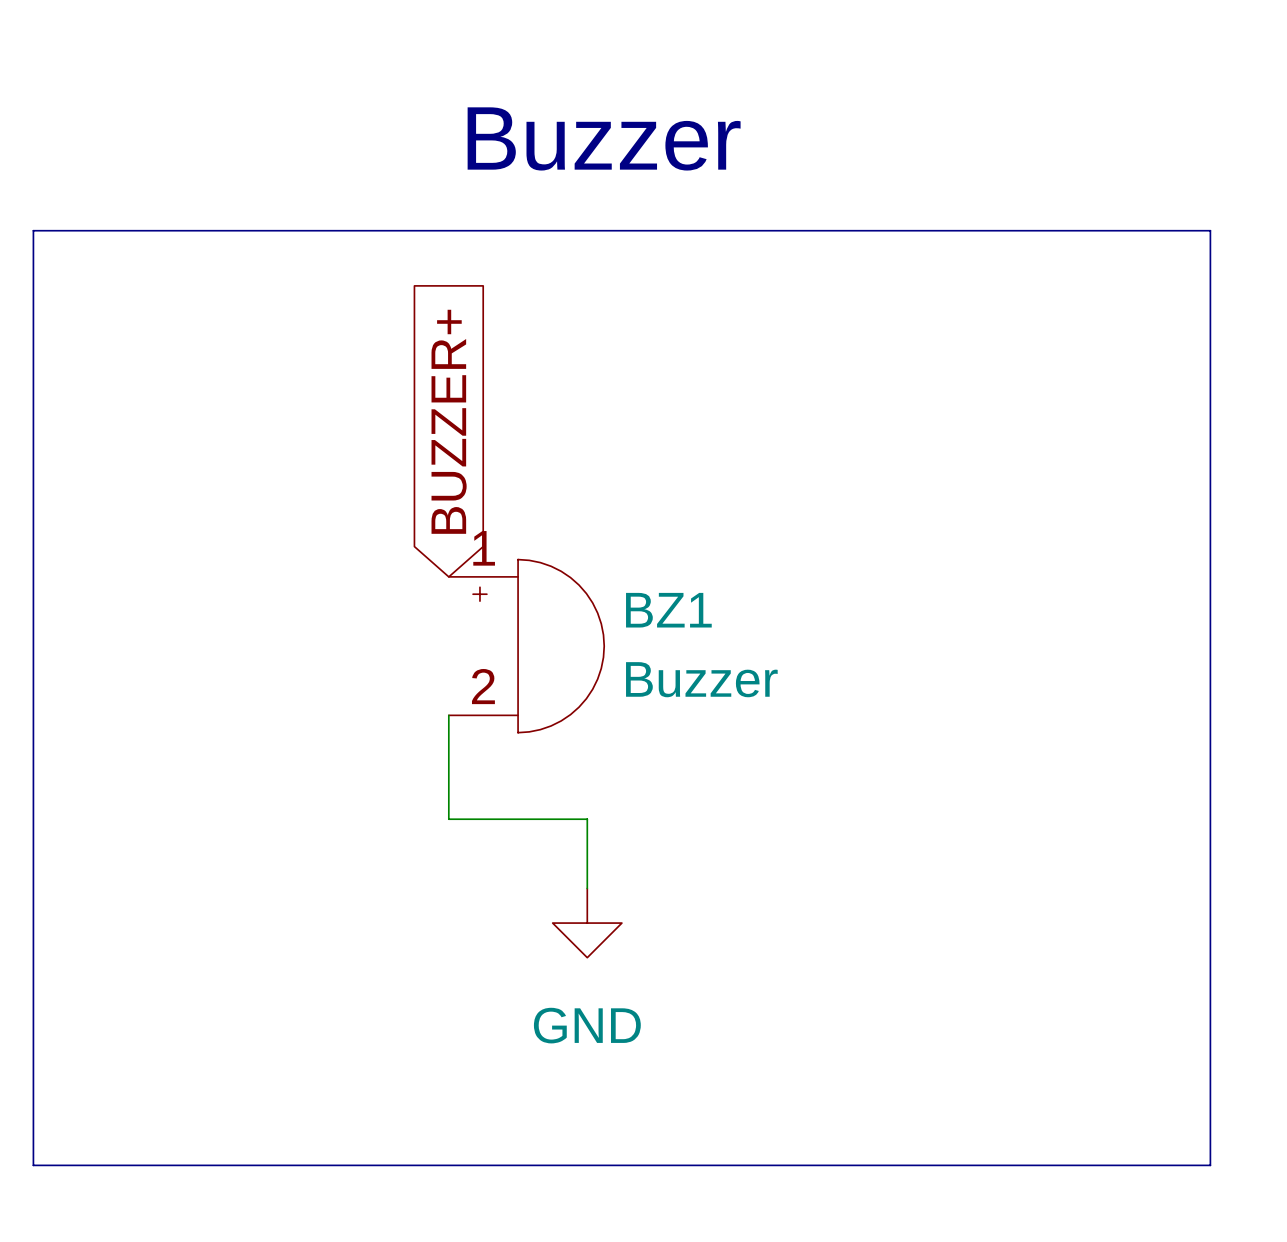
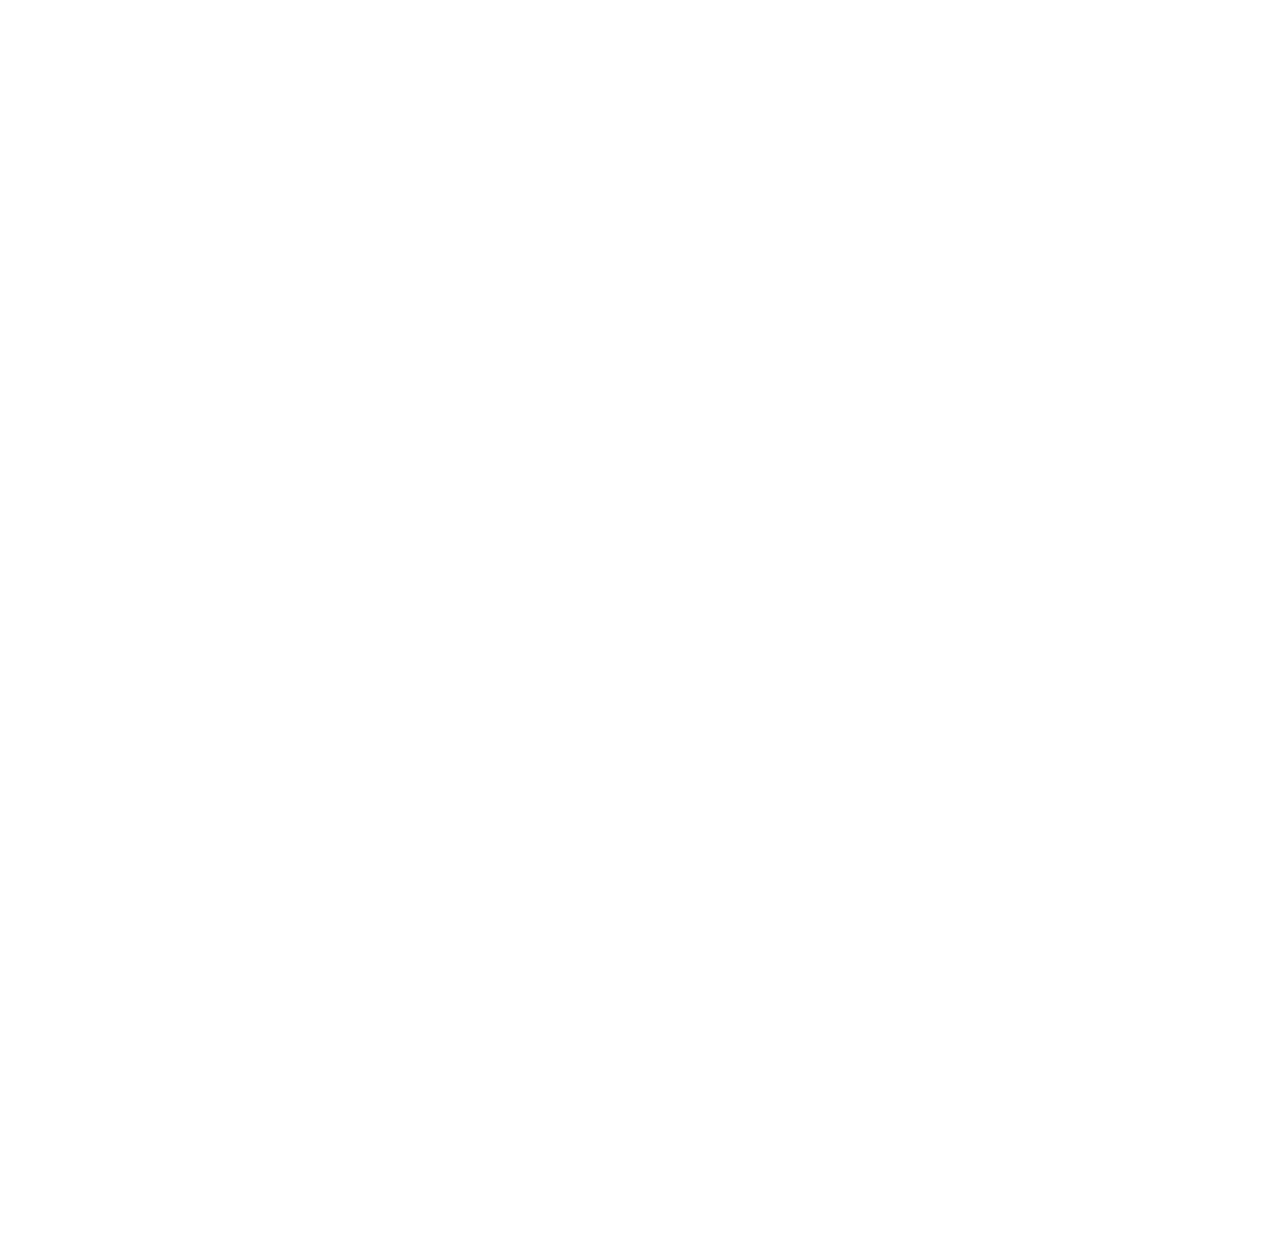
text: Buzzer (604, 138) -> none
line: (33, 230) (1210, 230) (1210, 1165) (33, 1165) (33, 230) -> none
global label: BUZZER+ (449, 421) -> none
BZ1: Buzzer (526, 646) -> none
wire: (448, 715) (448, 819) (587, 819) (587, 888) -> none
power symbol: GND (587, 923) -> none

